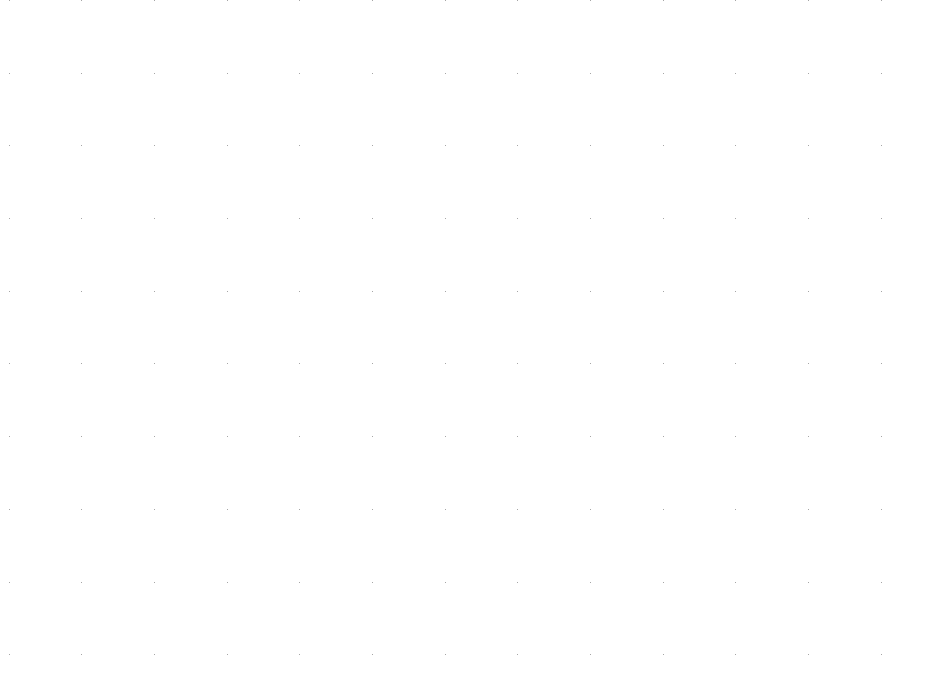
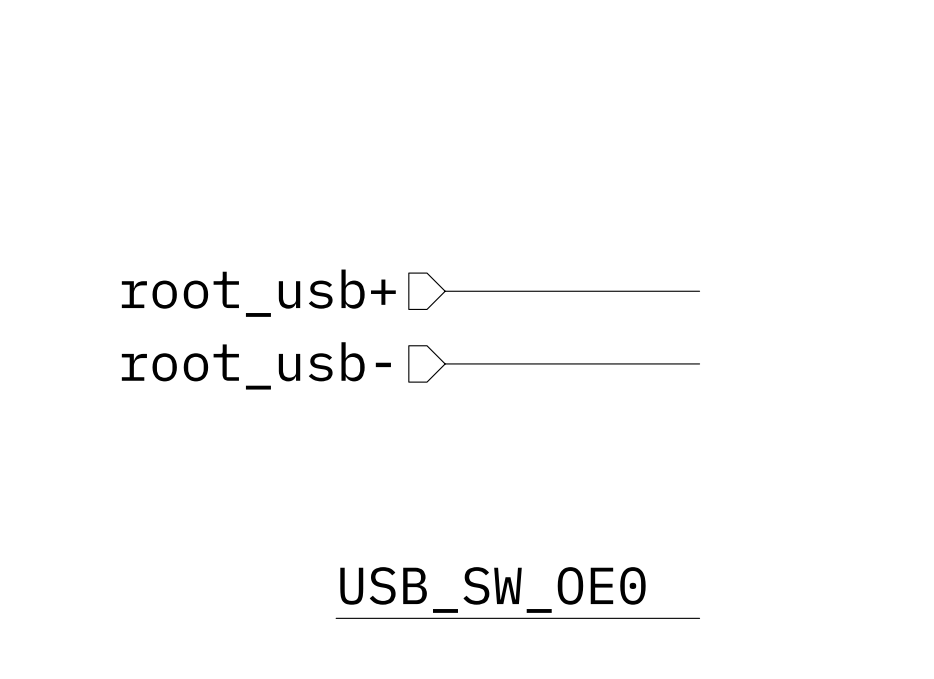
hierarchical label: none -> root_usb+ (258, 293)
wire: none -> (445, 291) (699, 291)
wire: none -> (445, 363) (699, 363)
hierarchical label: none -> root_usb- (256, 365)
label: none -> USB_SW_OE0 (492, 590)
wire: none -> (336, 618) (699, 618)

